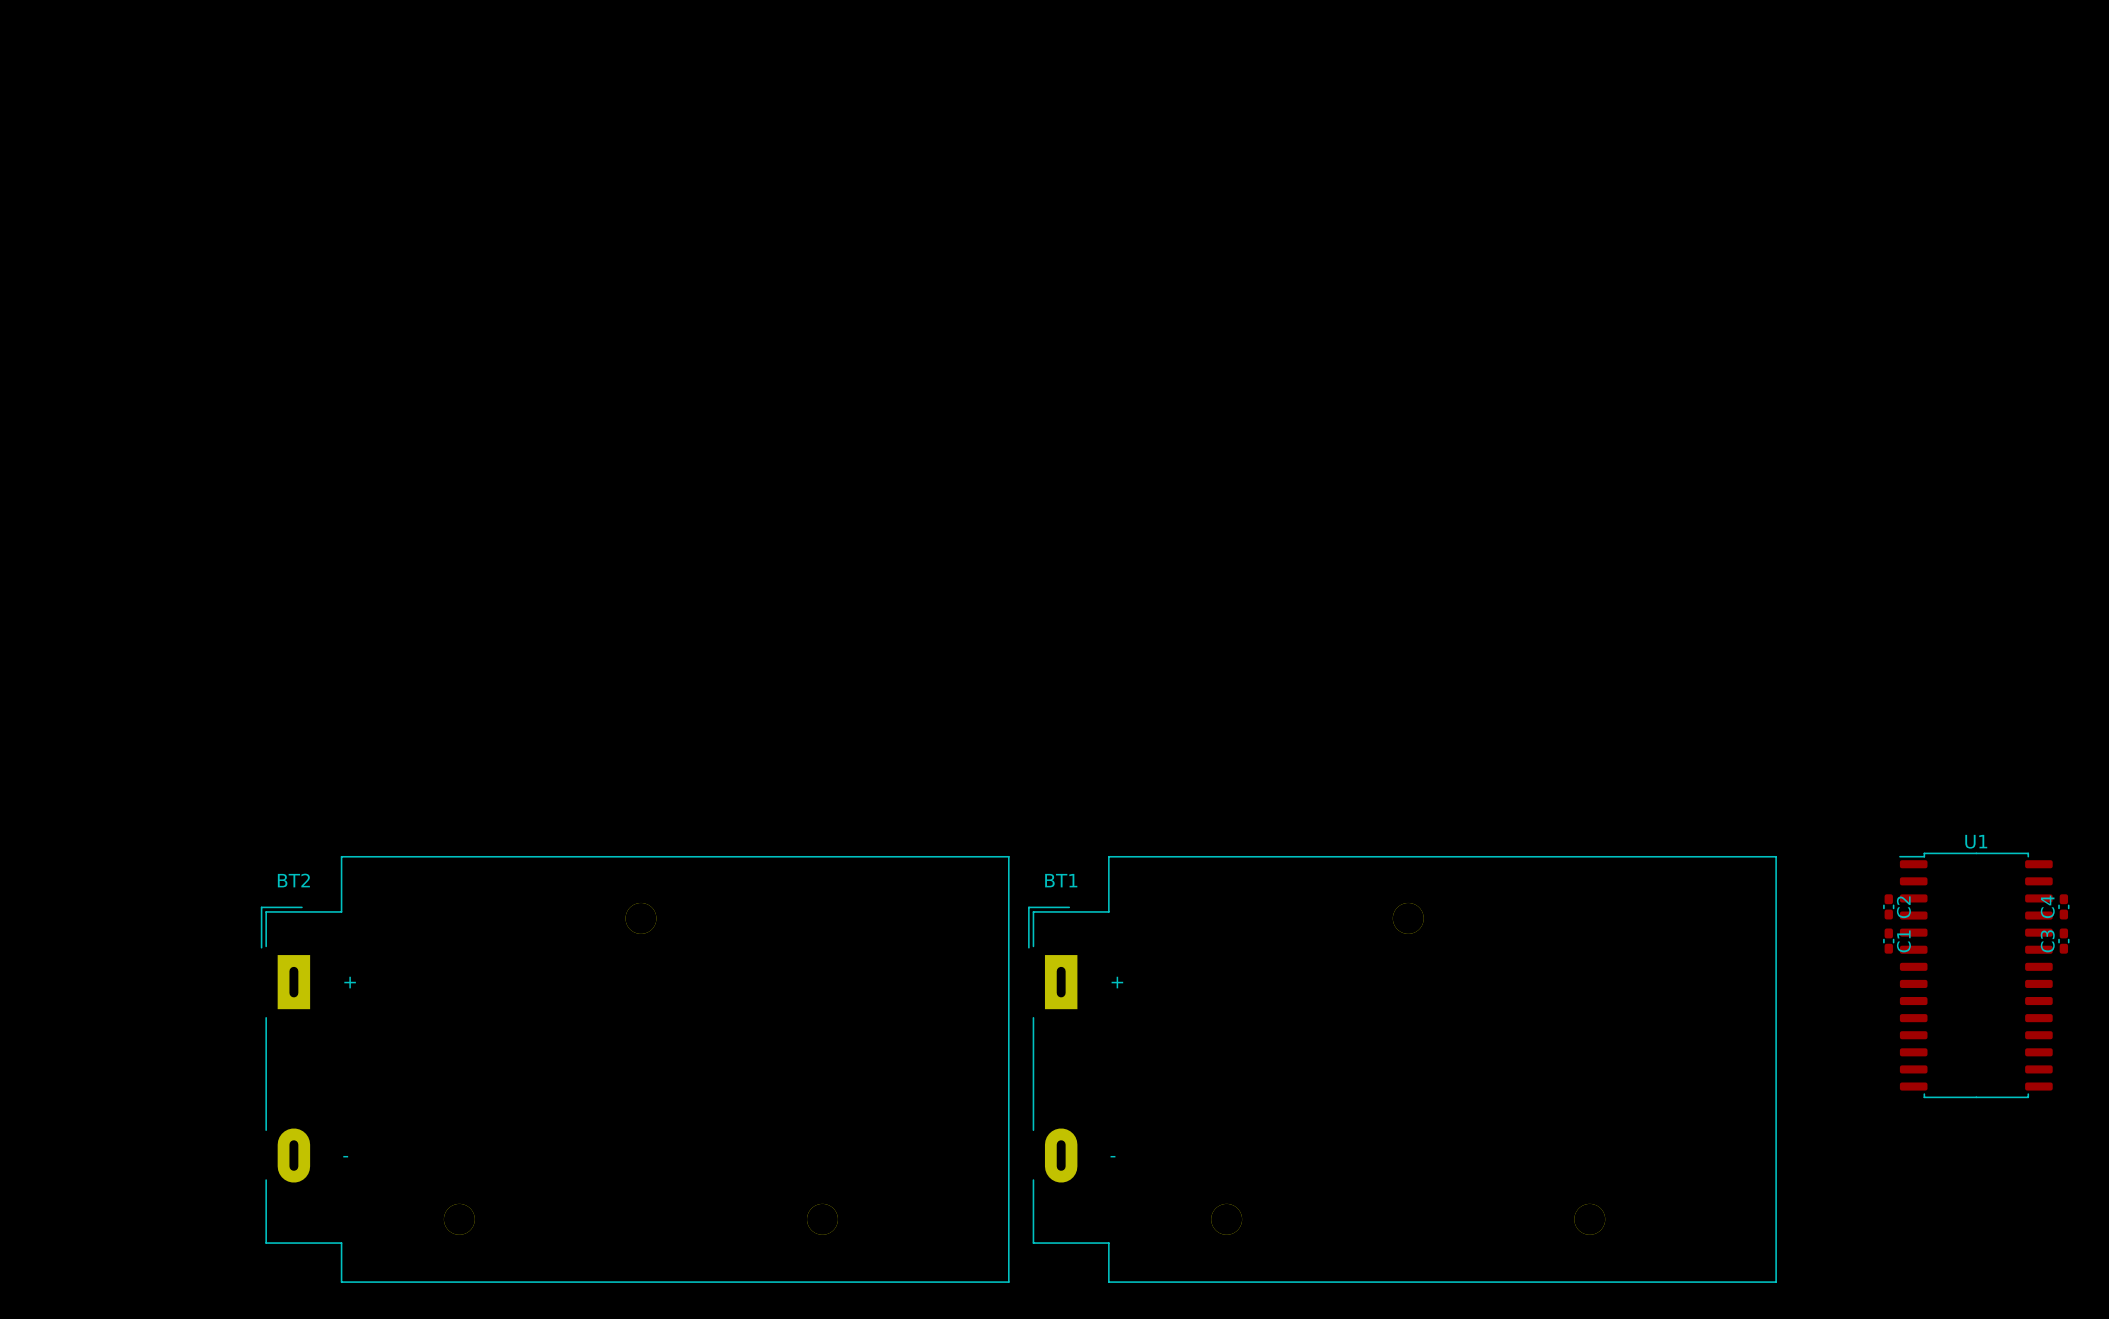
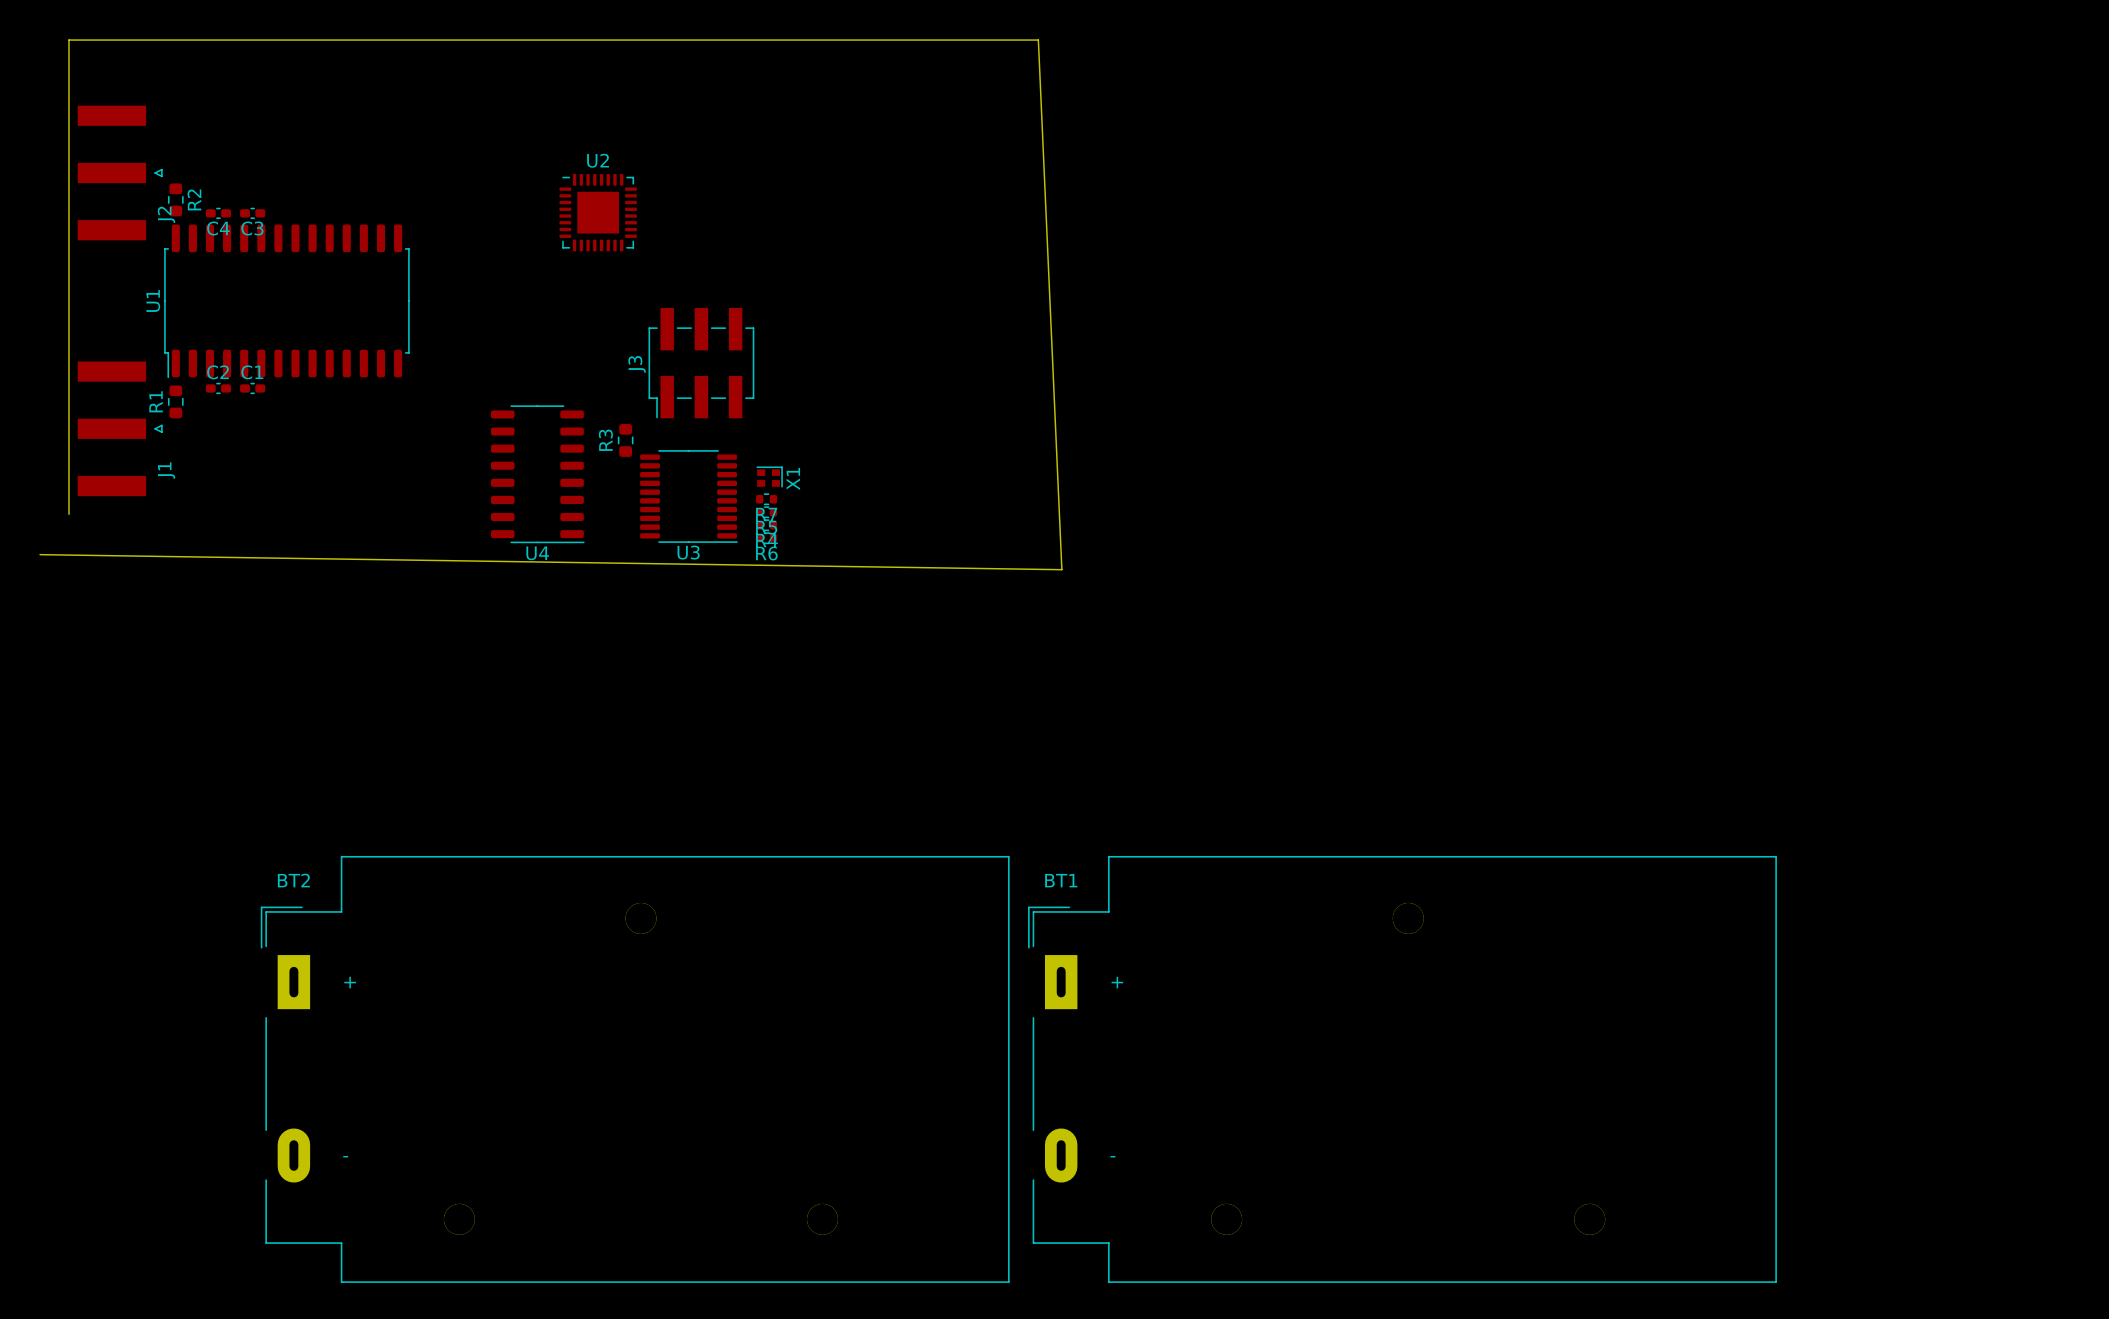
J2: none -> (120, 173)
R2: none -> (175, 199)
U2: none -> (598, 212)
J3: none -> (701, 363)
R1: none -> (175, 401)
J1: none -> (120, 428)
R3: none -> (625, 440)
U4: none -> (537, 474)
X1: none -> (769, 477)
U3: none -> (688, 496)
R7: none -> (766, 499)
R5: none -> (766, 512)
board edge: none -> (68, 514) (68, 40) (1038, 40) (1061, 569) (40, 554)
R4: none -> (766, 525)
R6: none -> (766, 538)
C2 rotation: 0° (1888, 906) -> 90° clockwise (218, 388)
C2 position: (1888, 906) -> (218, 388)
C4 rotation: 0° (2063, 906) -> 90° clockwise (218, 213)
C4 position: (2063, 906) -> (218, 213)
C1 rotation: 0° (1888, 941) -> 90° clockwise (252, 388)
C1 position: (1888, 941) -> (252, 388)
C3 rotation: 0° (2063, 941) -> 90° clockwise (252, 213)
C3 position: (2063, 941) -> (252, 213)
U1 rotation: 0° (1975, 975) -> 90° counterclockwise (286, 301)
U1 position: (1975, 975) -> (286, 301)

